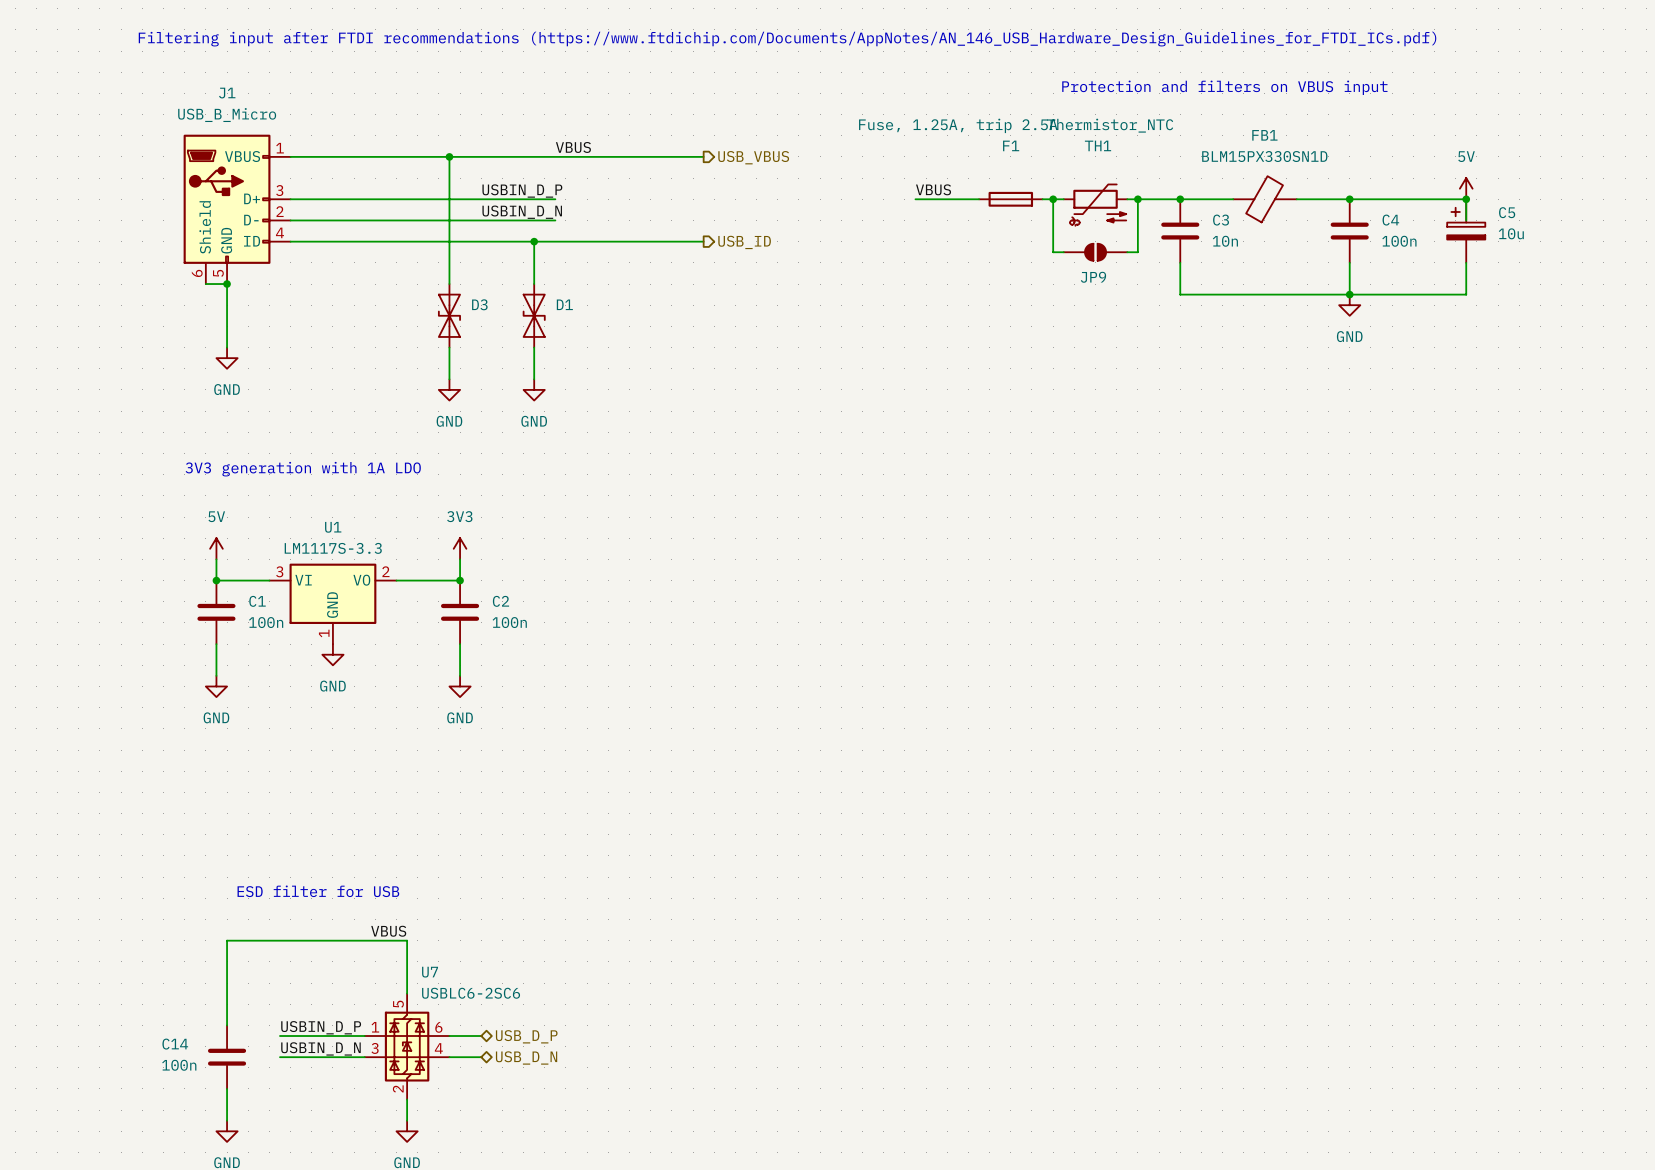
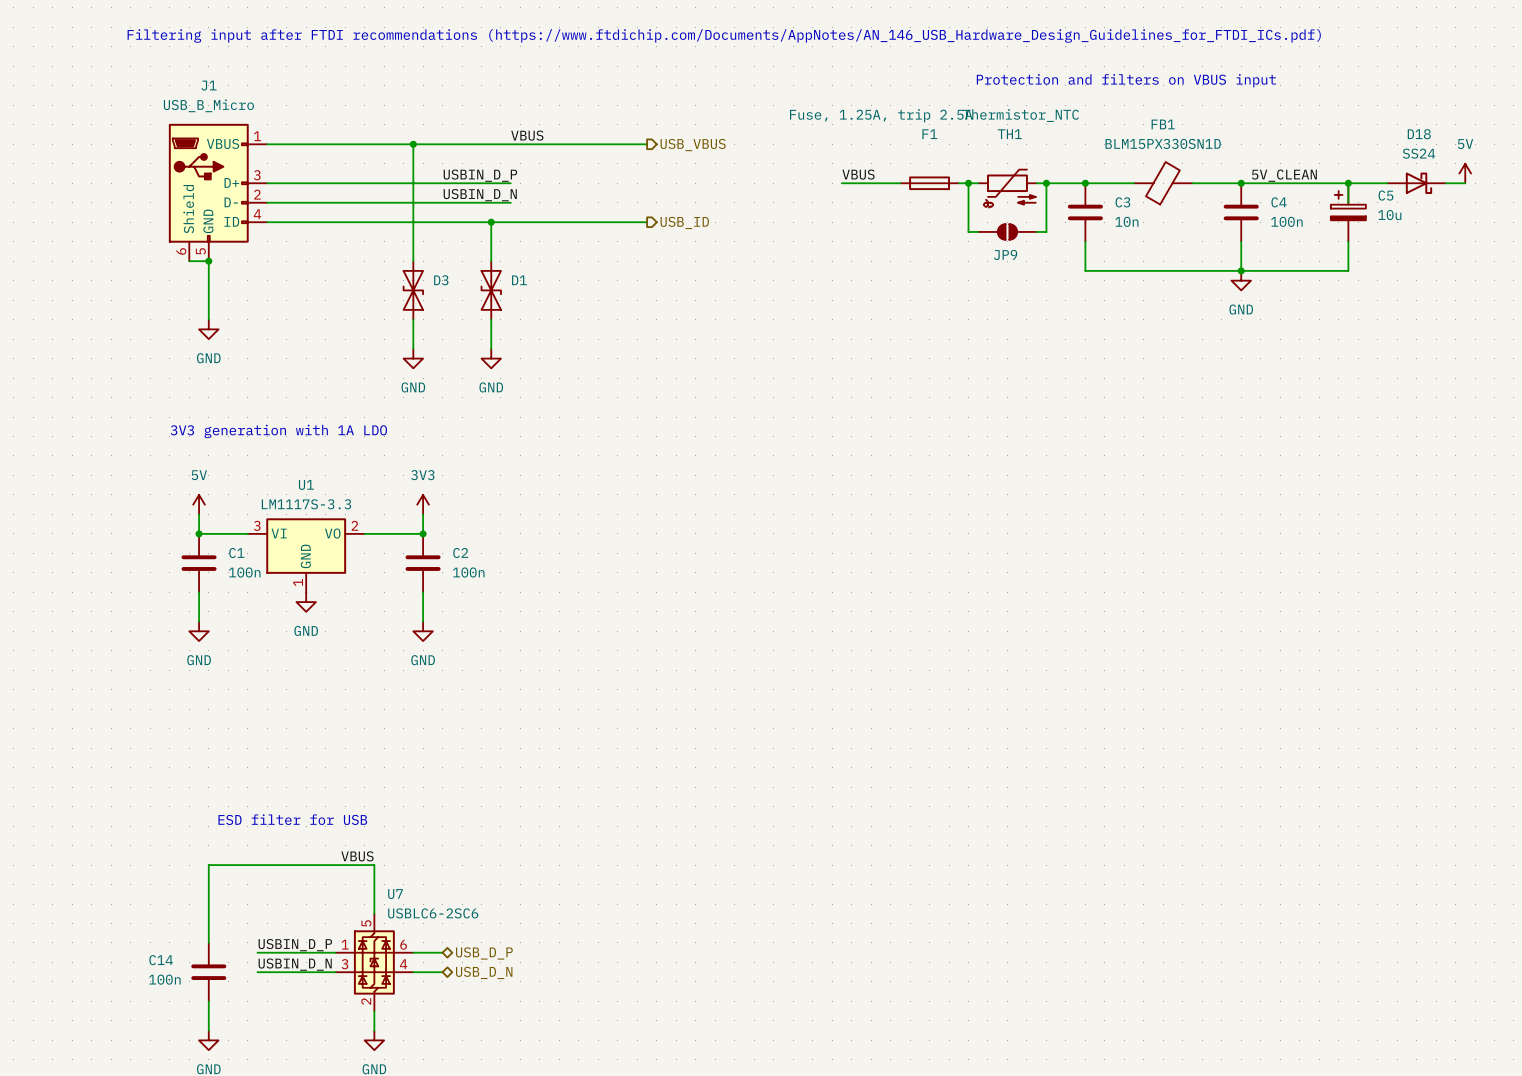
power symbol position: 5V (1466, 188) -> 5V (1465, 173)
label: none -> 5V_CLEAN (1284, 175)
wire: none -> (1348, 183) (1387, 183)
D18: none -> SS24 (1416, 183)
wire: none -> (1445, 183) (1465, 183)

